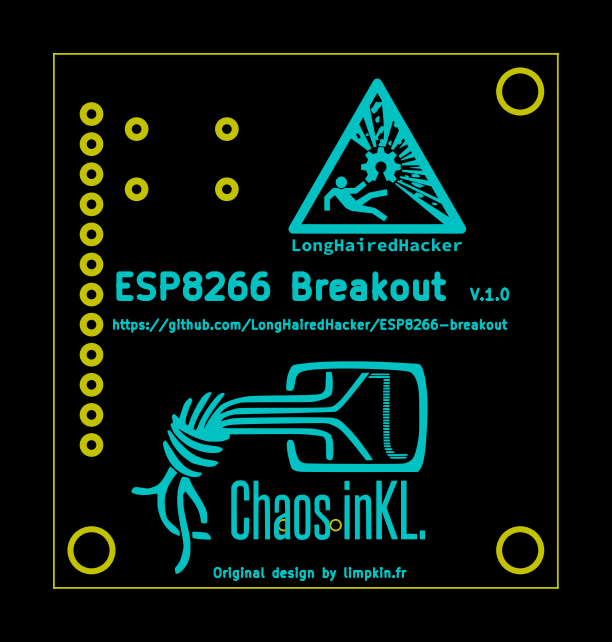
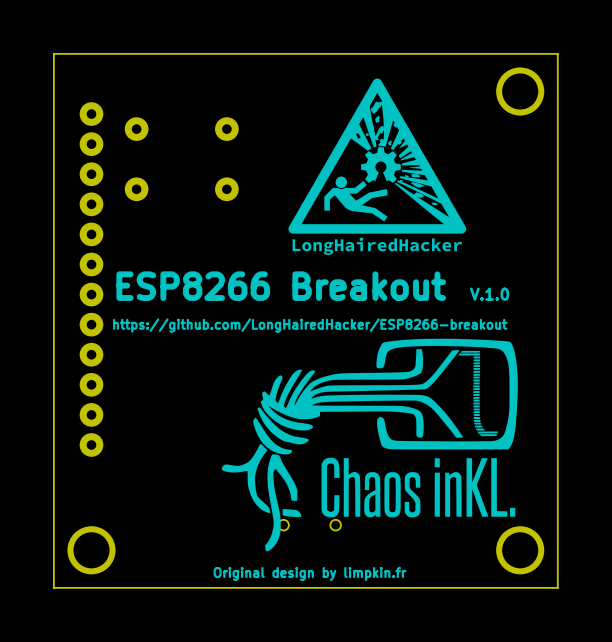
drawing position: (279, 467) -> (369, 445)

